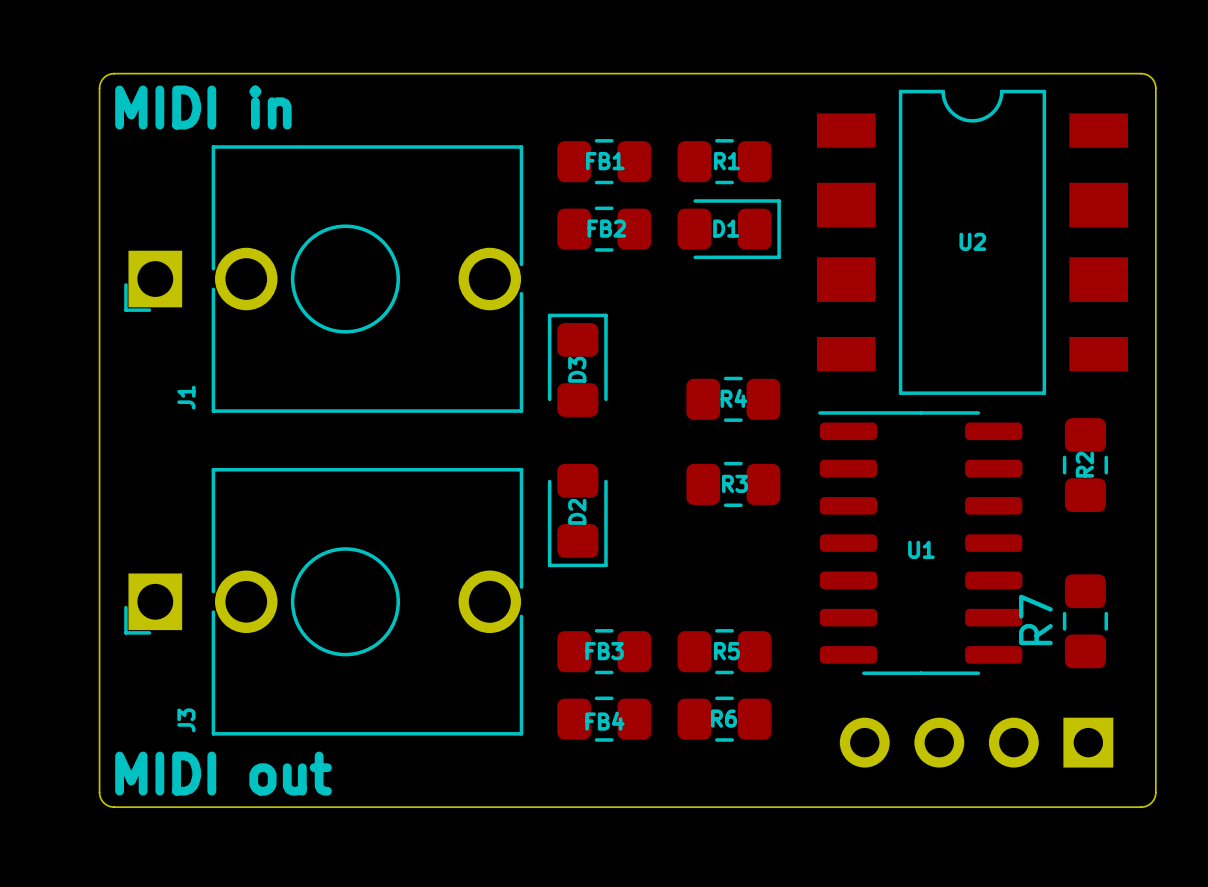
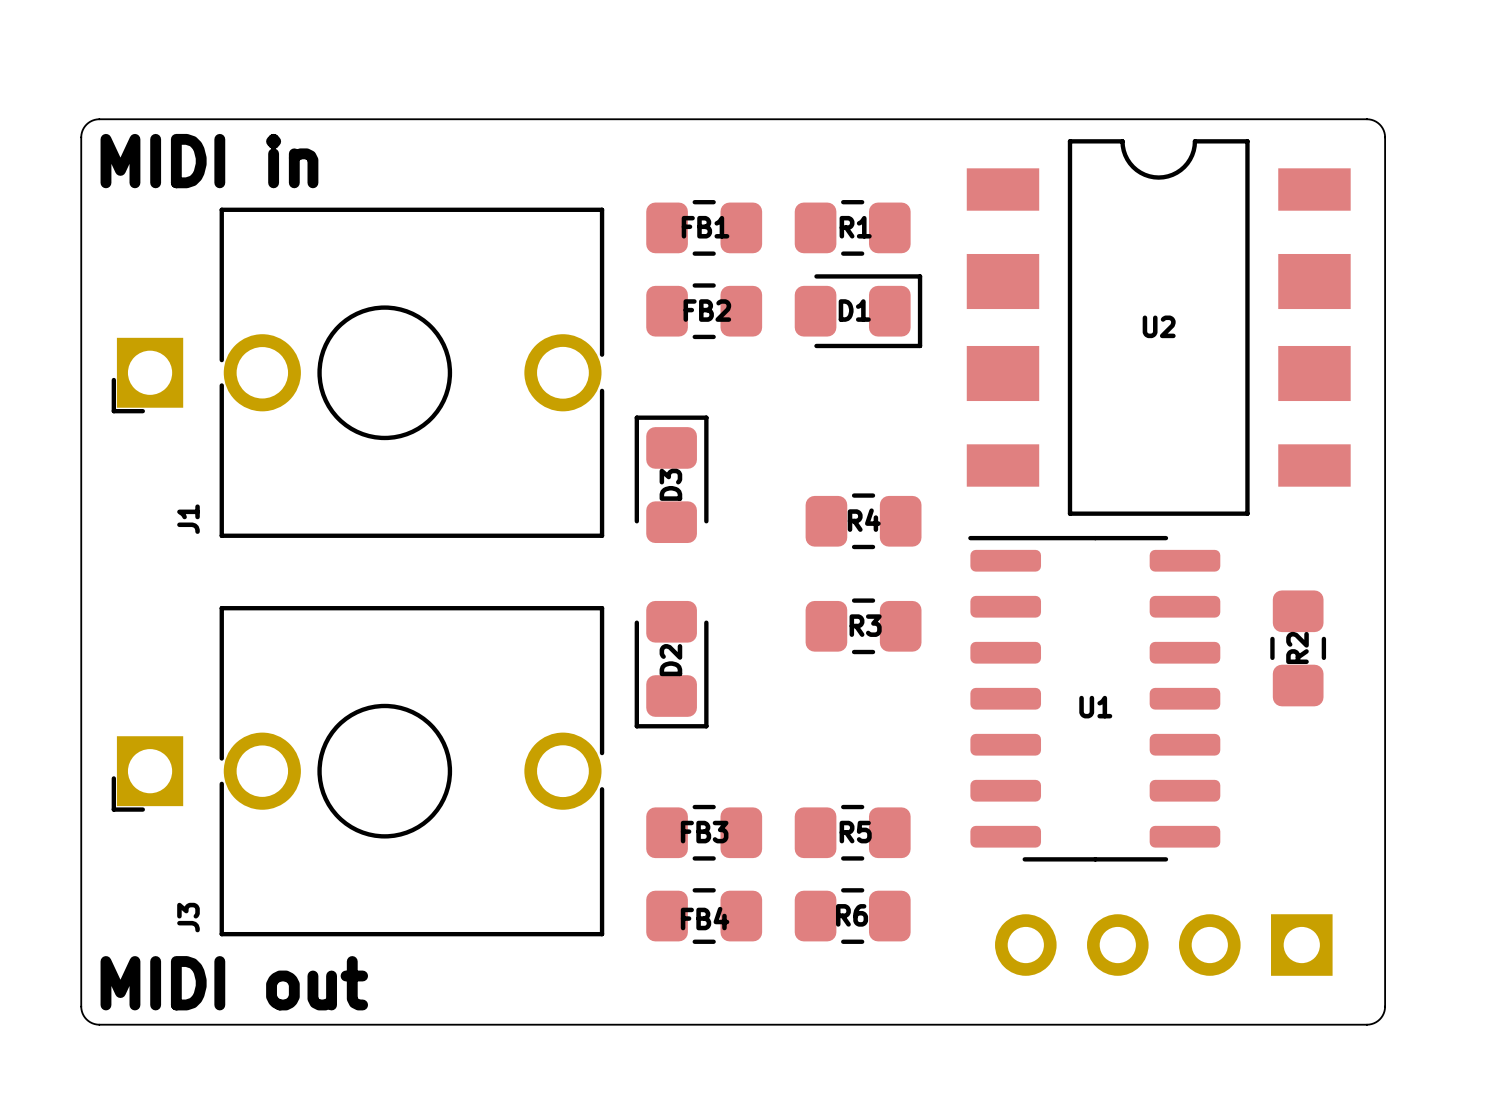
R2 position: (1085, 465) -> (1298, 648)
R7: (1085, 621) -> none

